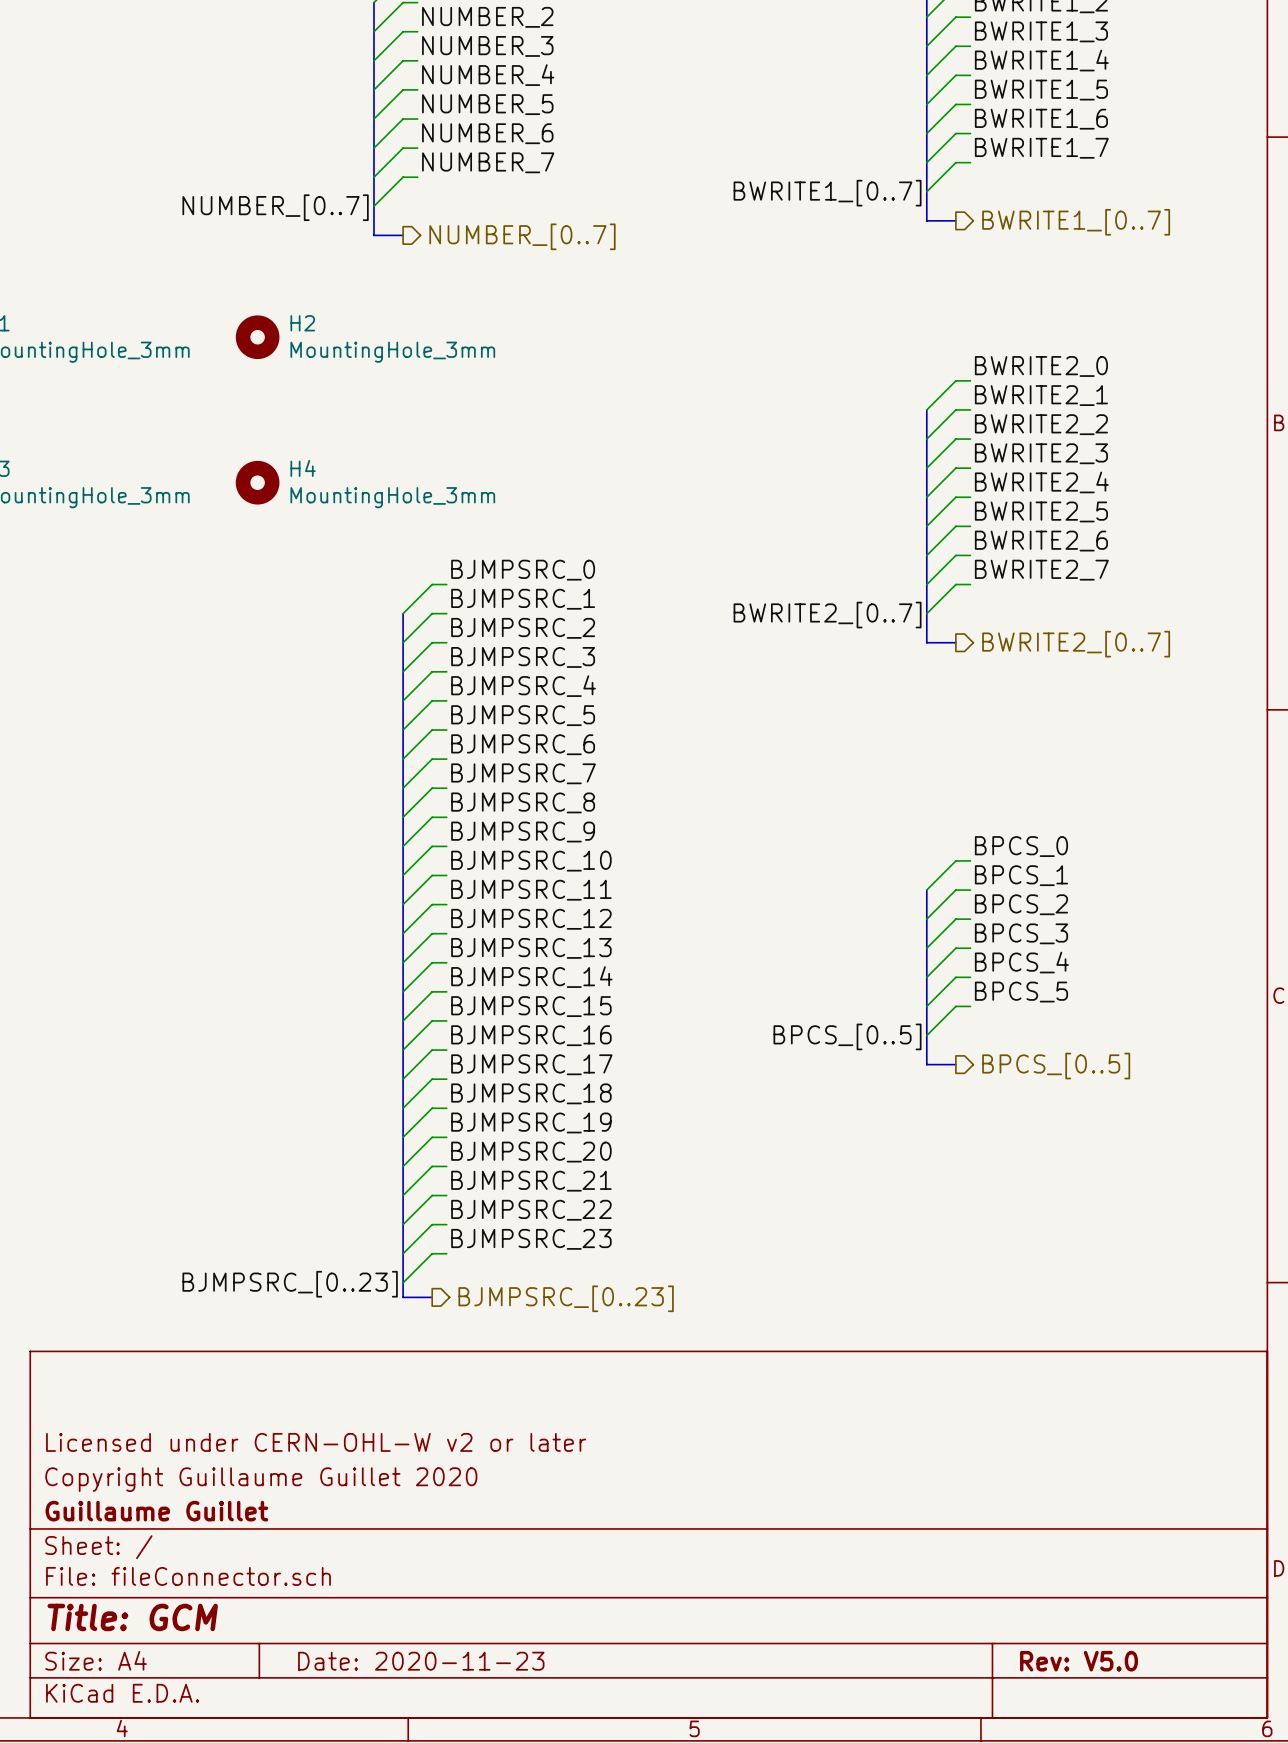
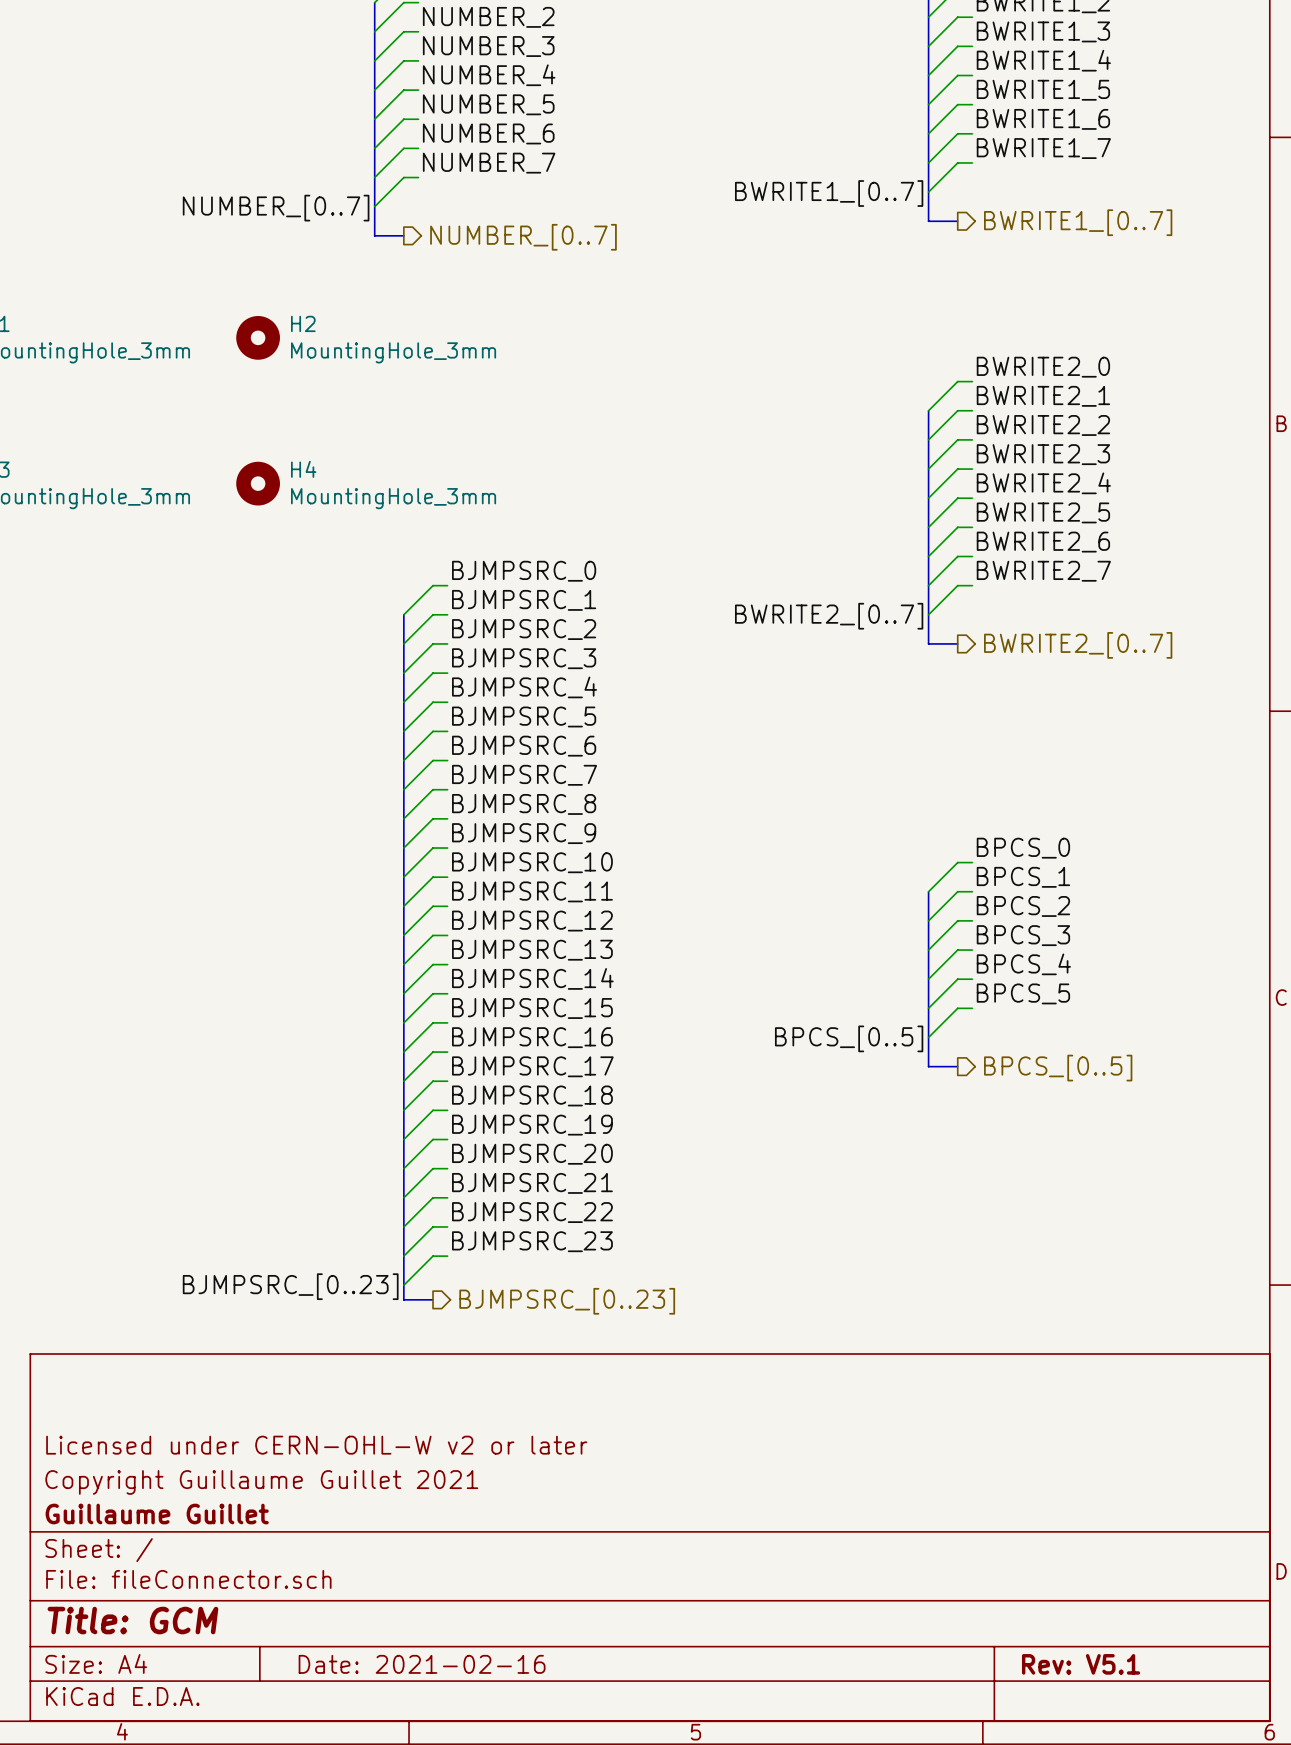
title block: Copyright Guillaume Guillet 2020 (261, 1479) -> Copyright Guillaume Guillet 2021 (261, 1482)
title block: Date: 2020-11-23 (421, 1661) -> Date: 2021-02-16 (422, 1664)
title block: Rev: V5.0 (1079, 1661) -> Rev: V5.1 (1081, 1664)

